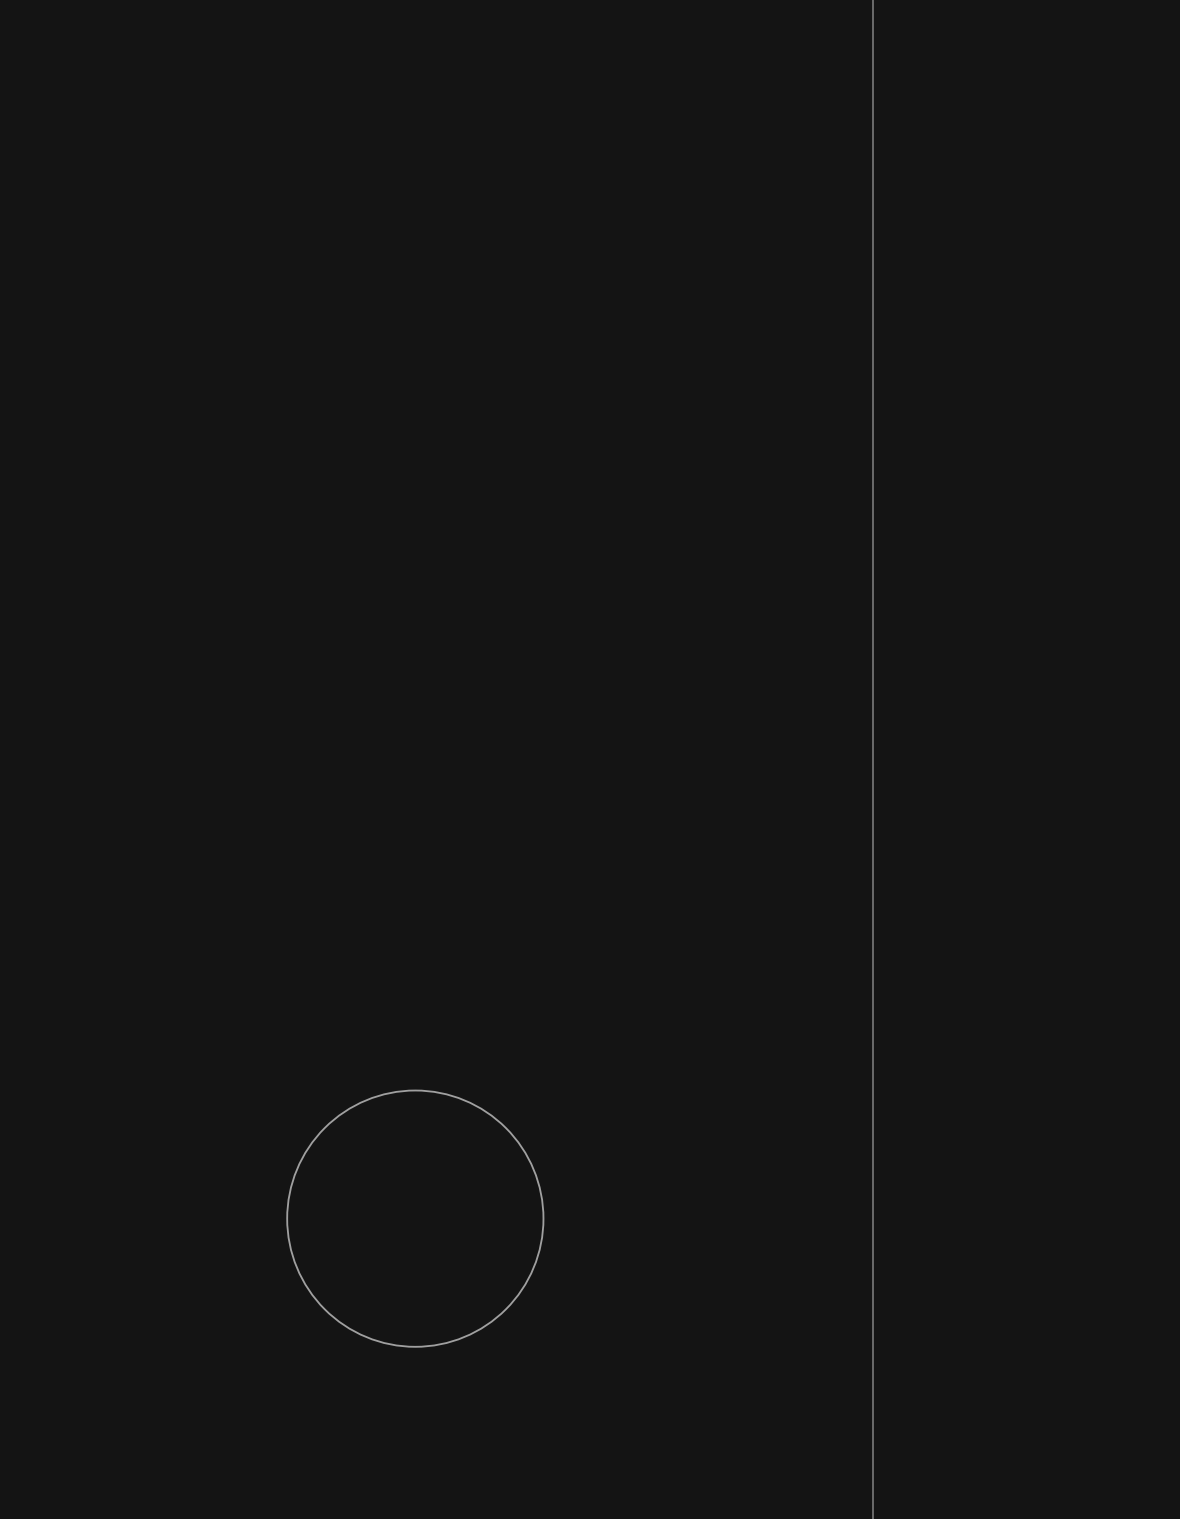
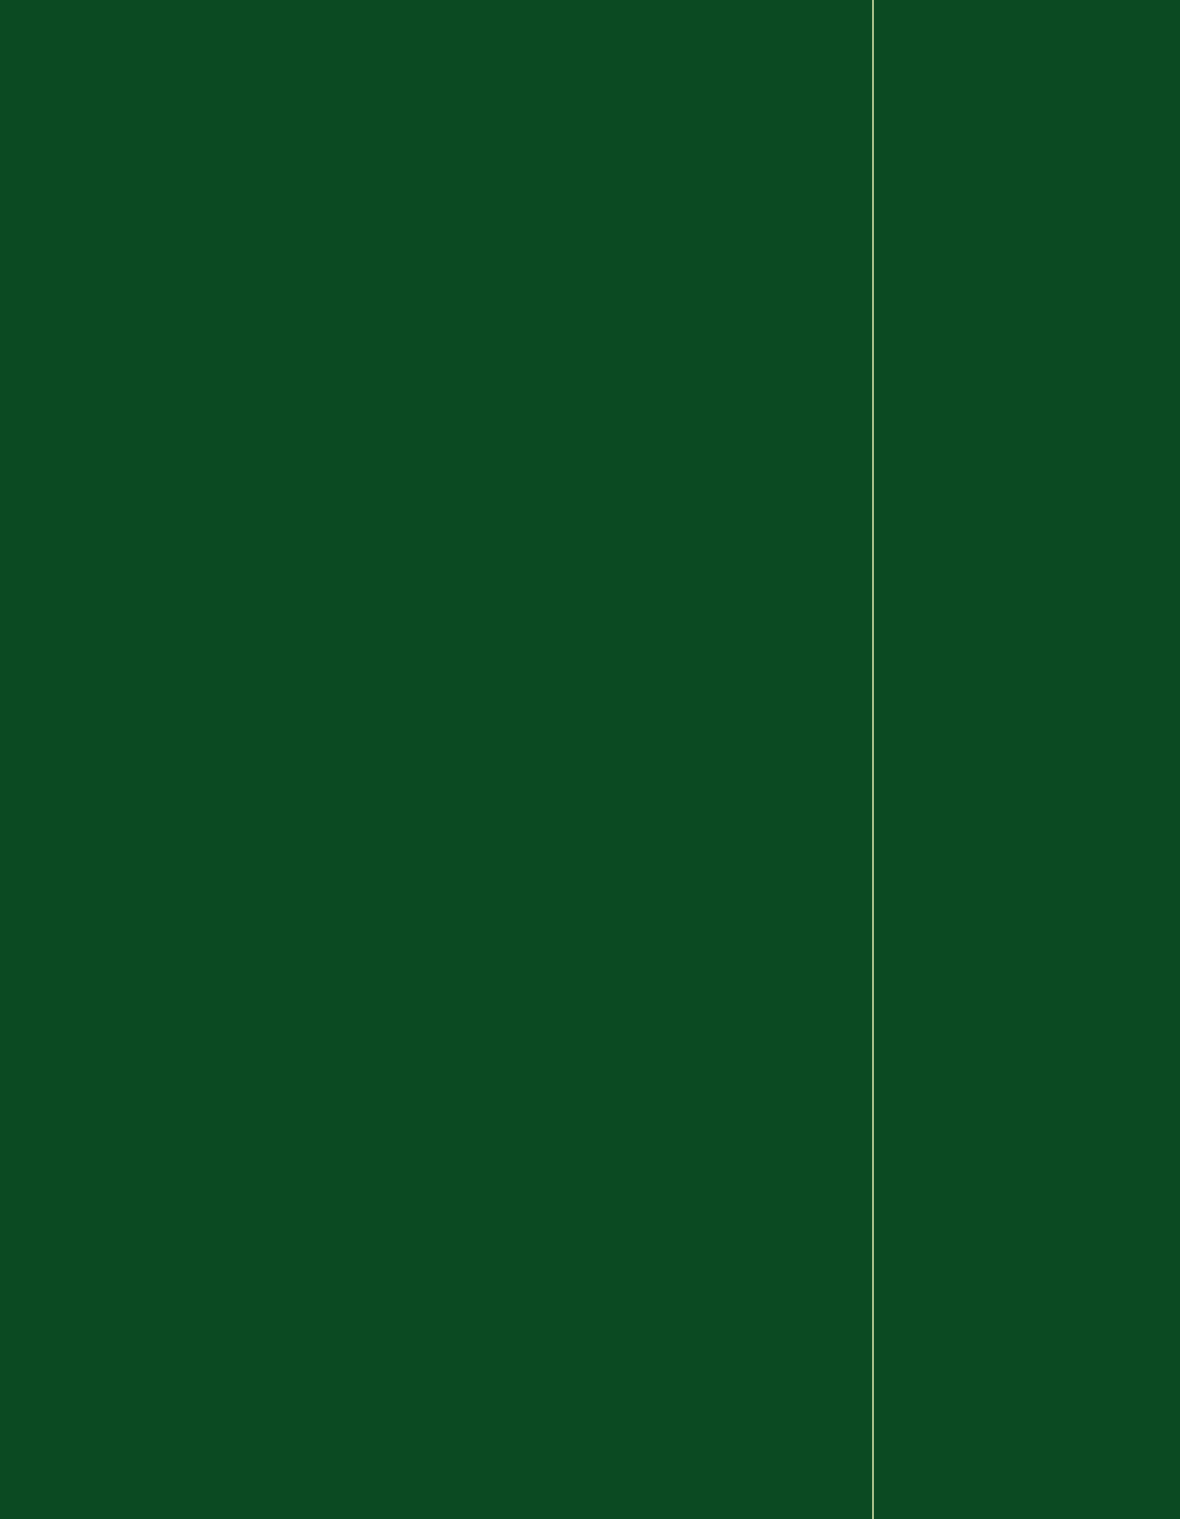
drawing: [286, 1089, 545, 1348] -> none

